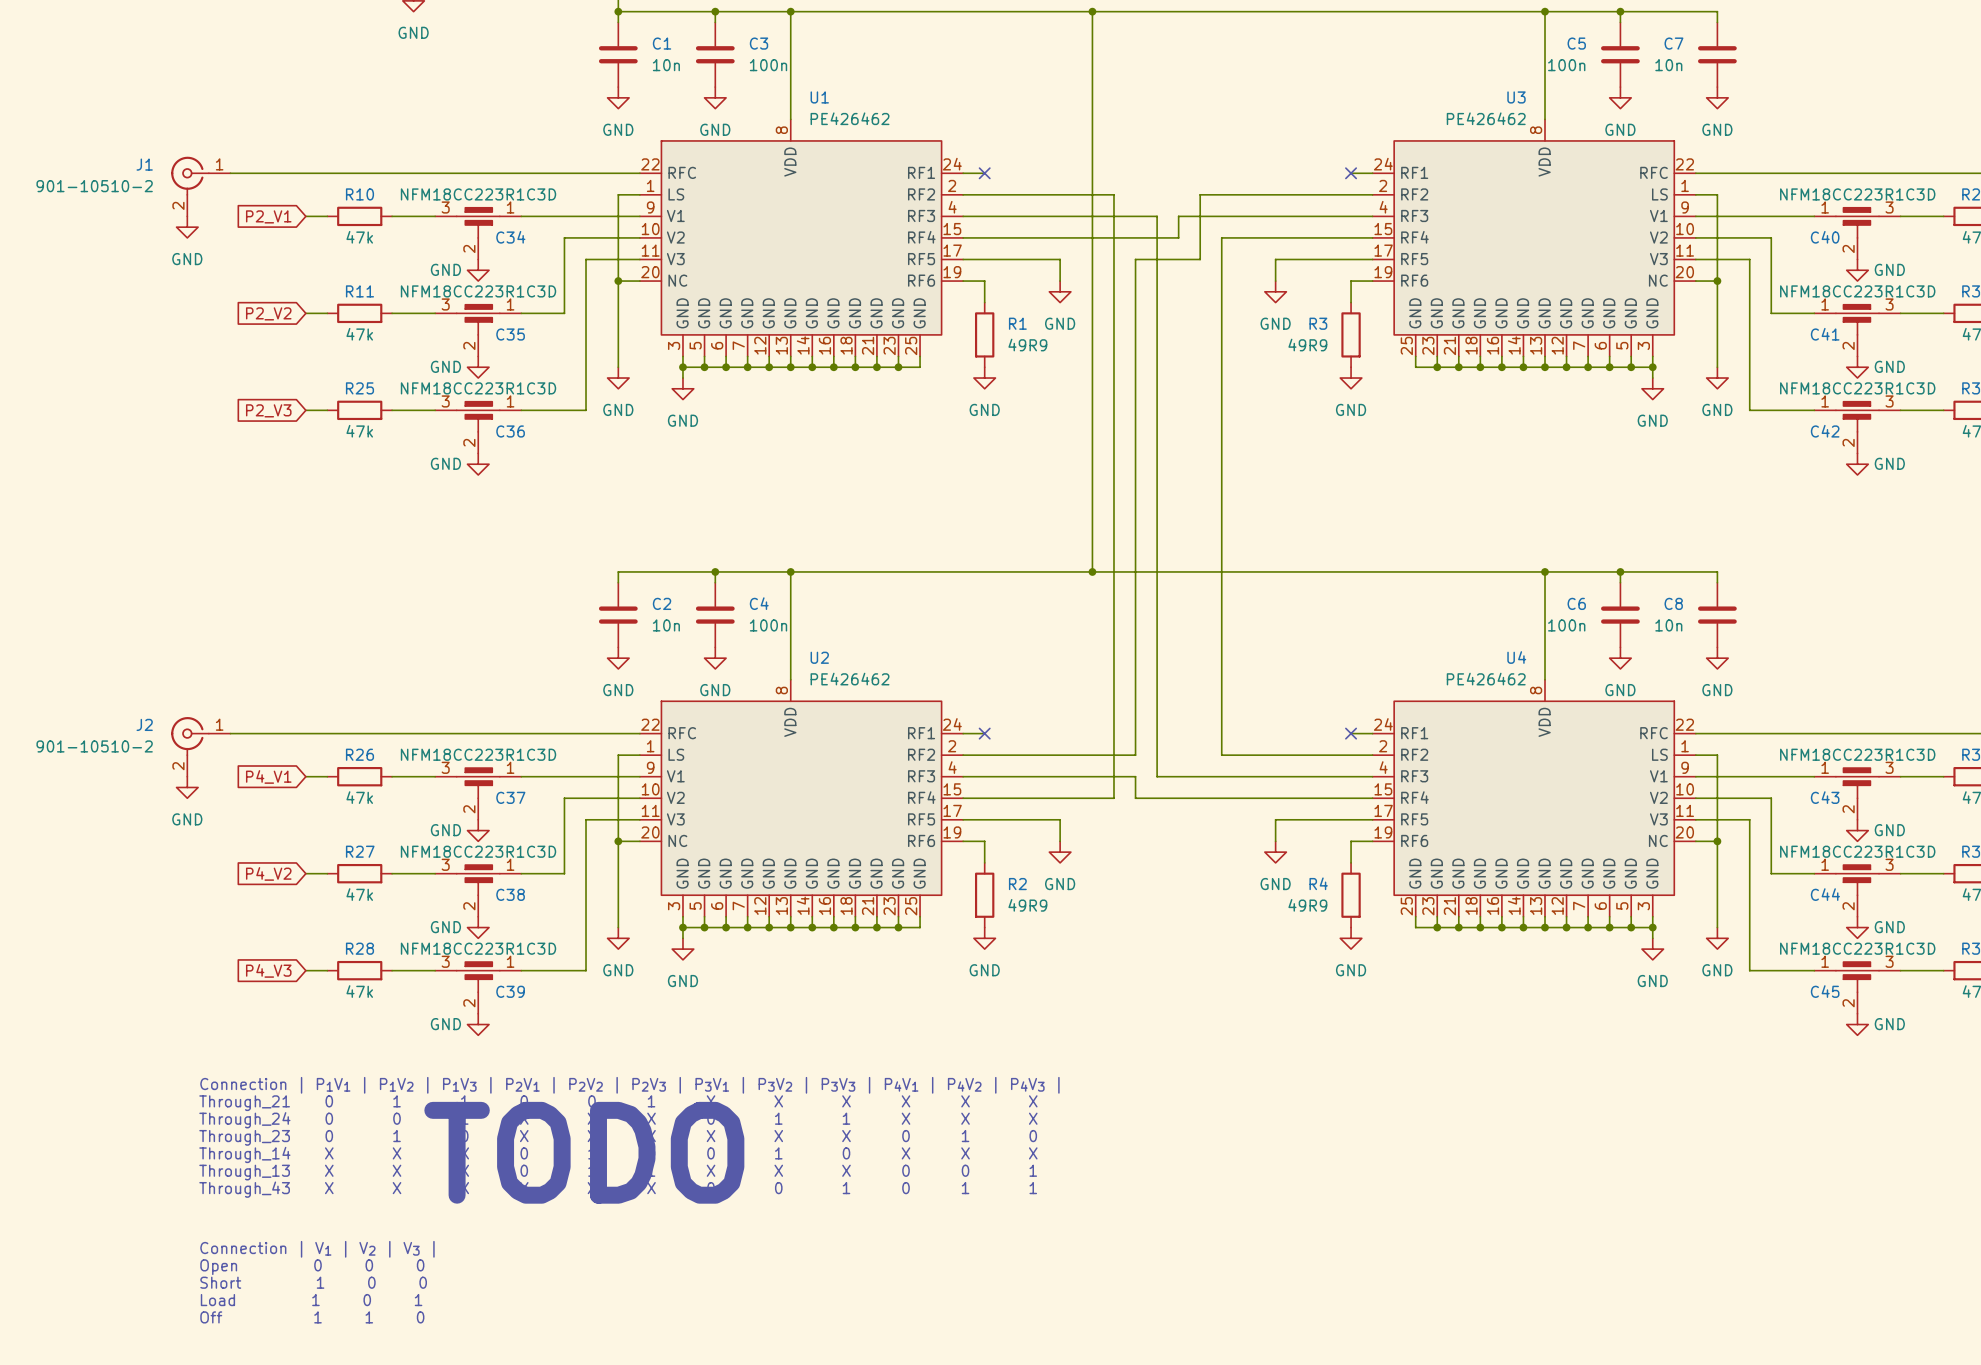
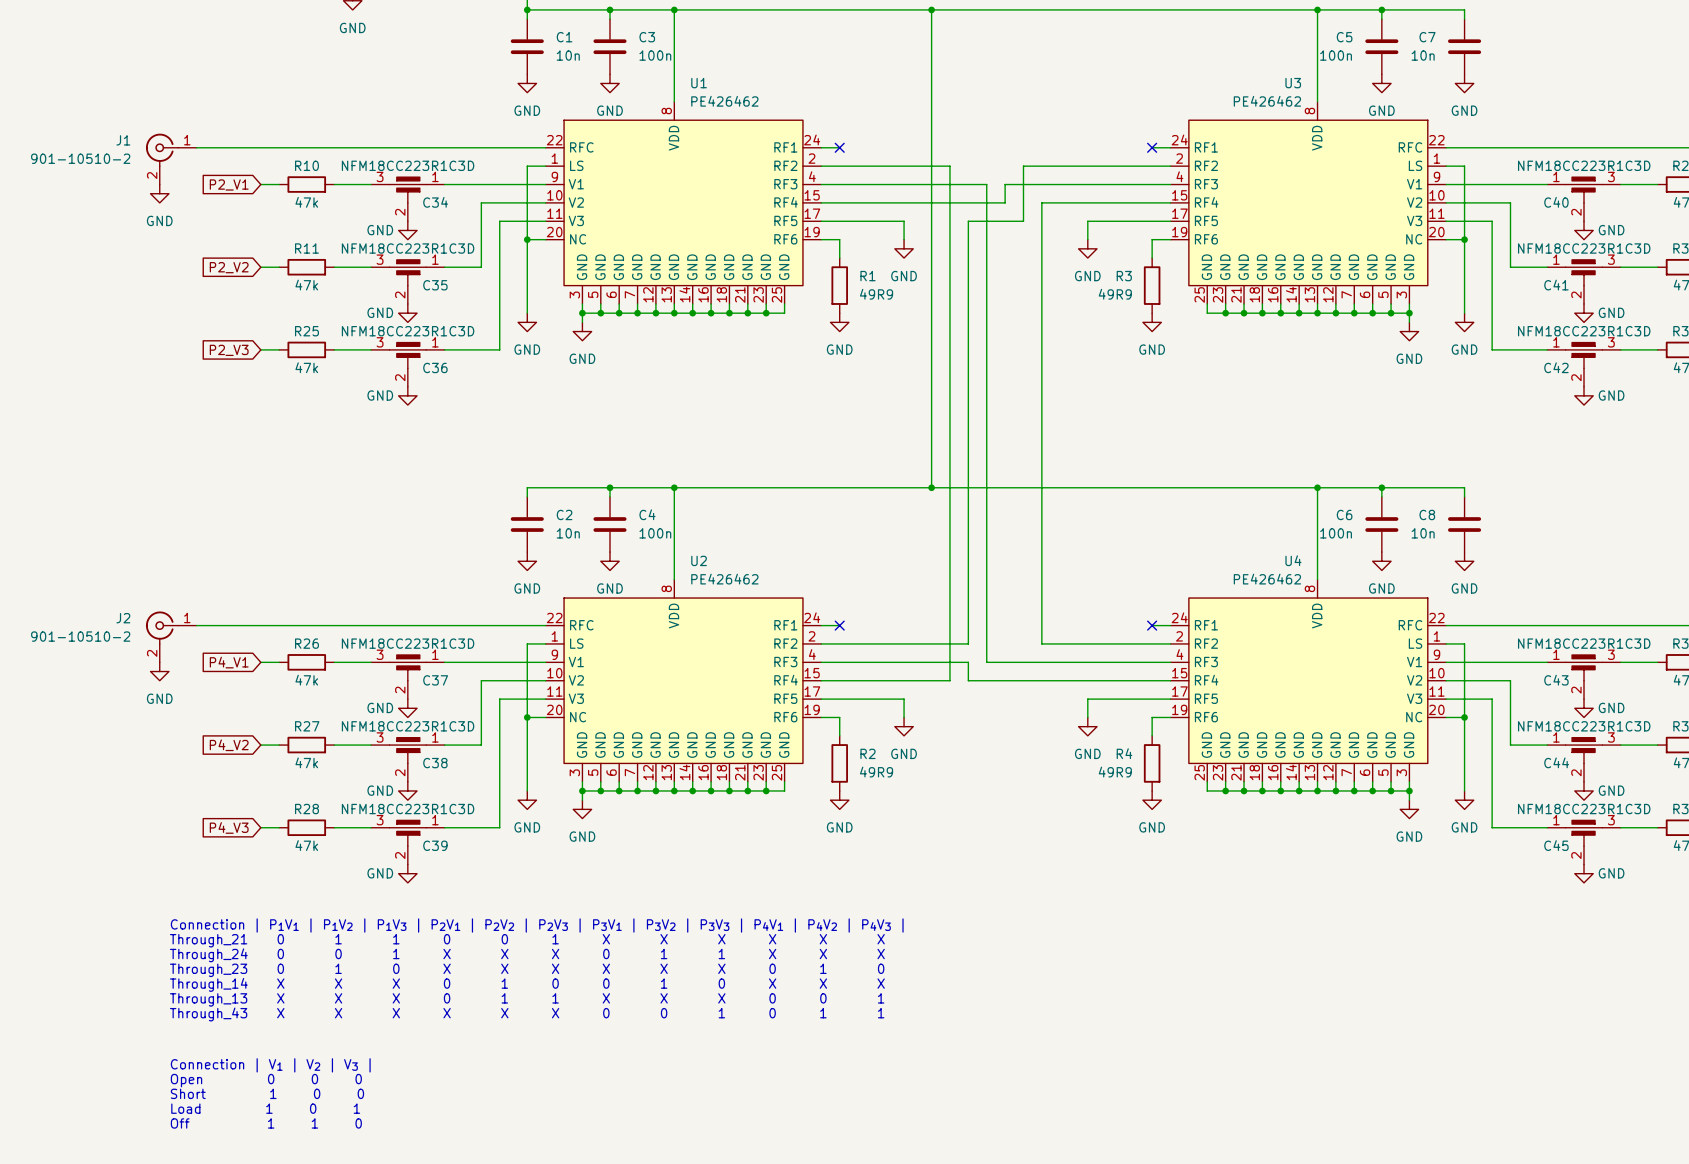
text: TODO (584, 1152) -> none

